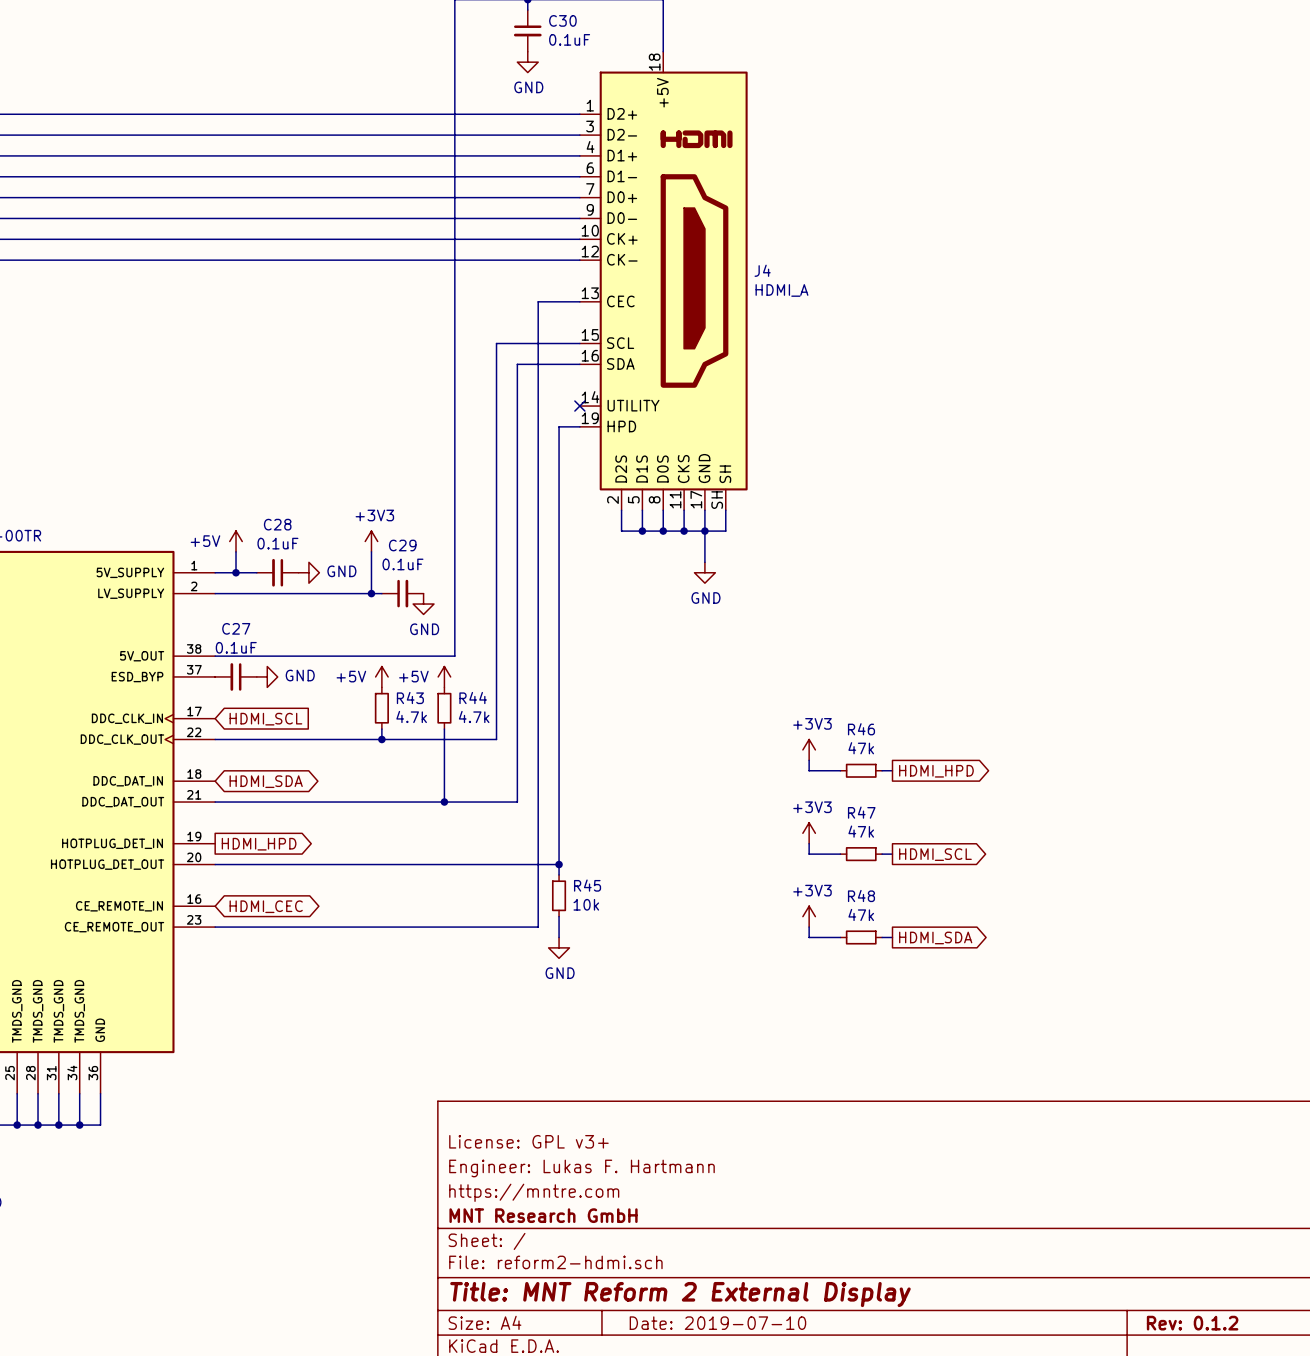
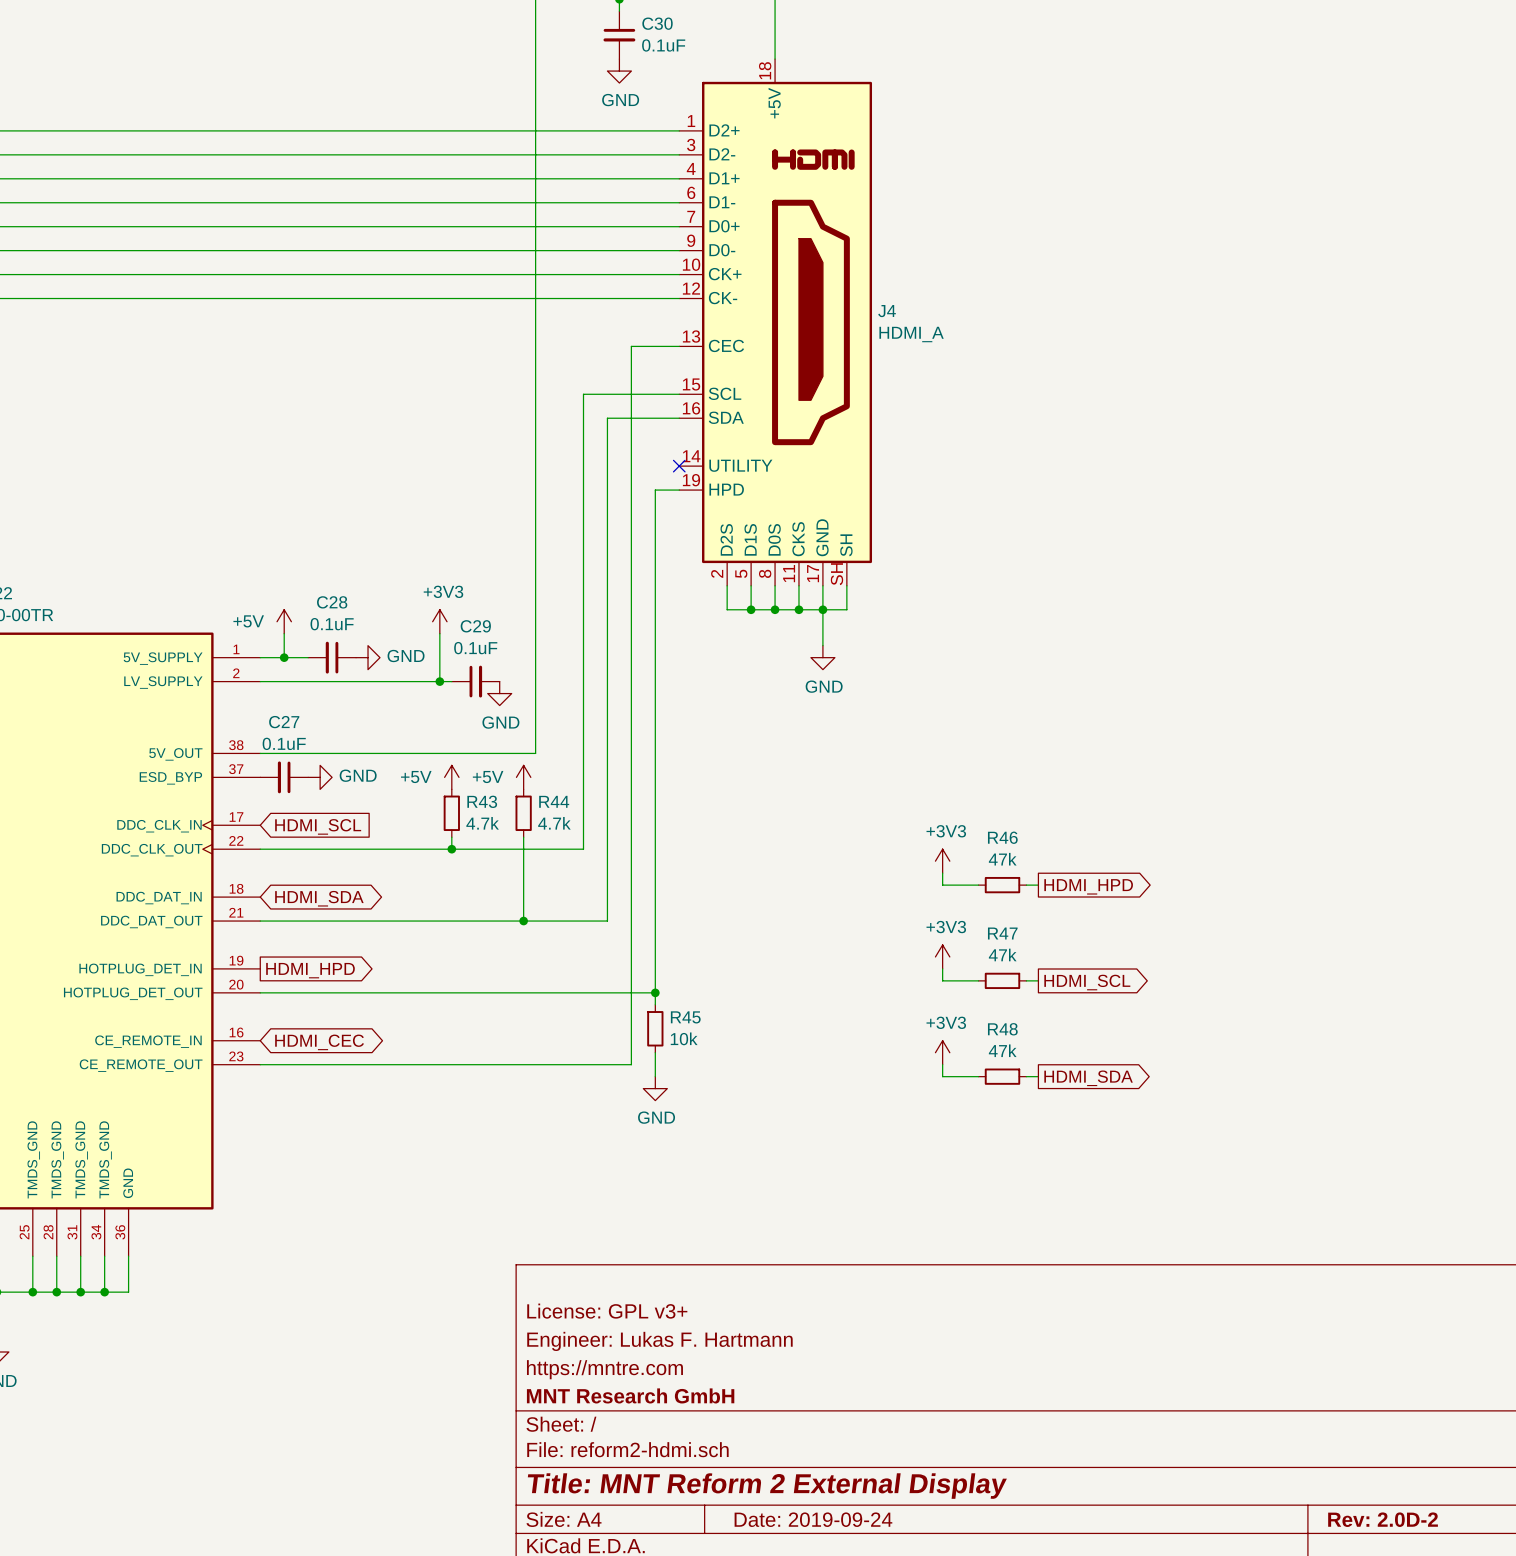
title block: Date: 2019-07-10 (717, 1323) -> Date: 2019-09-24 (813, 1519)
title block: Rev: 0.1.2 (1192, 1323) -> Rev: 2.0D-2 (1383, 1519)

